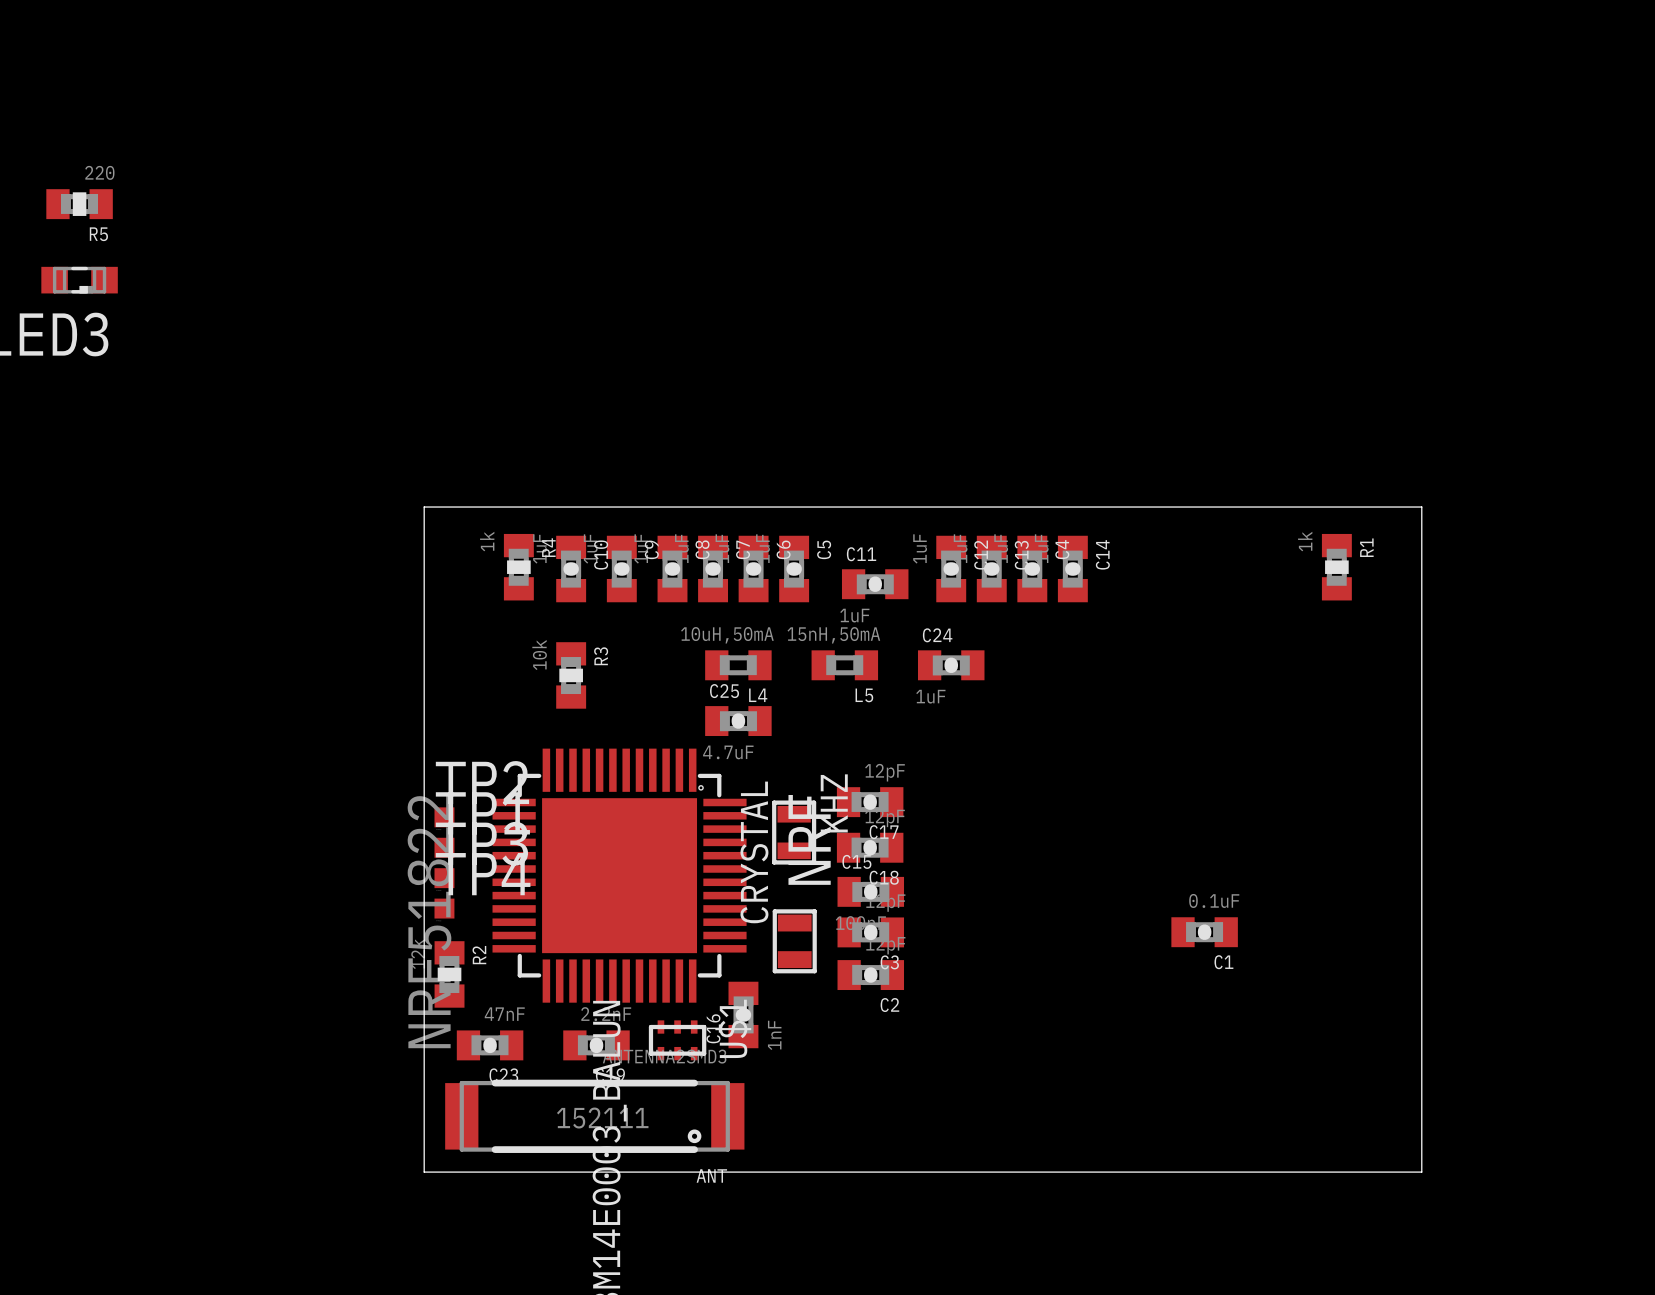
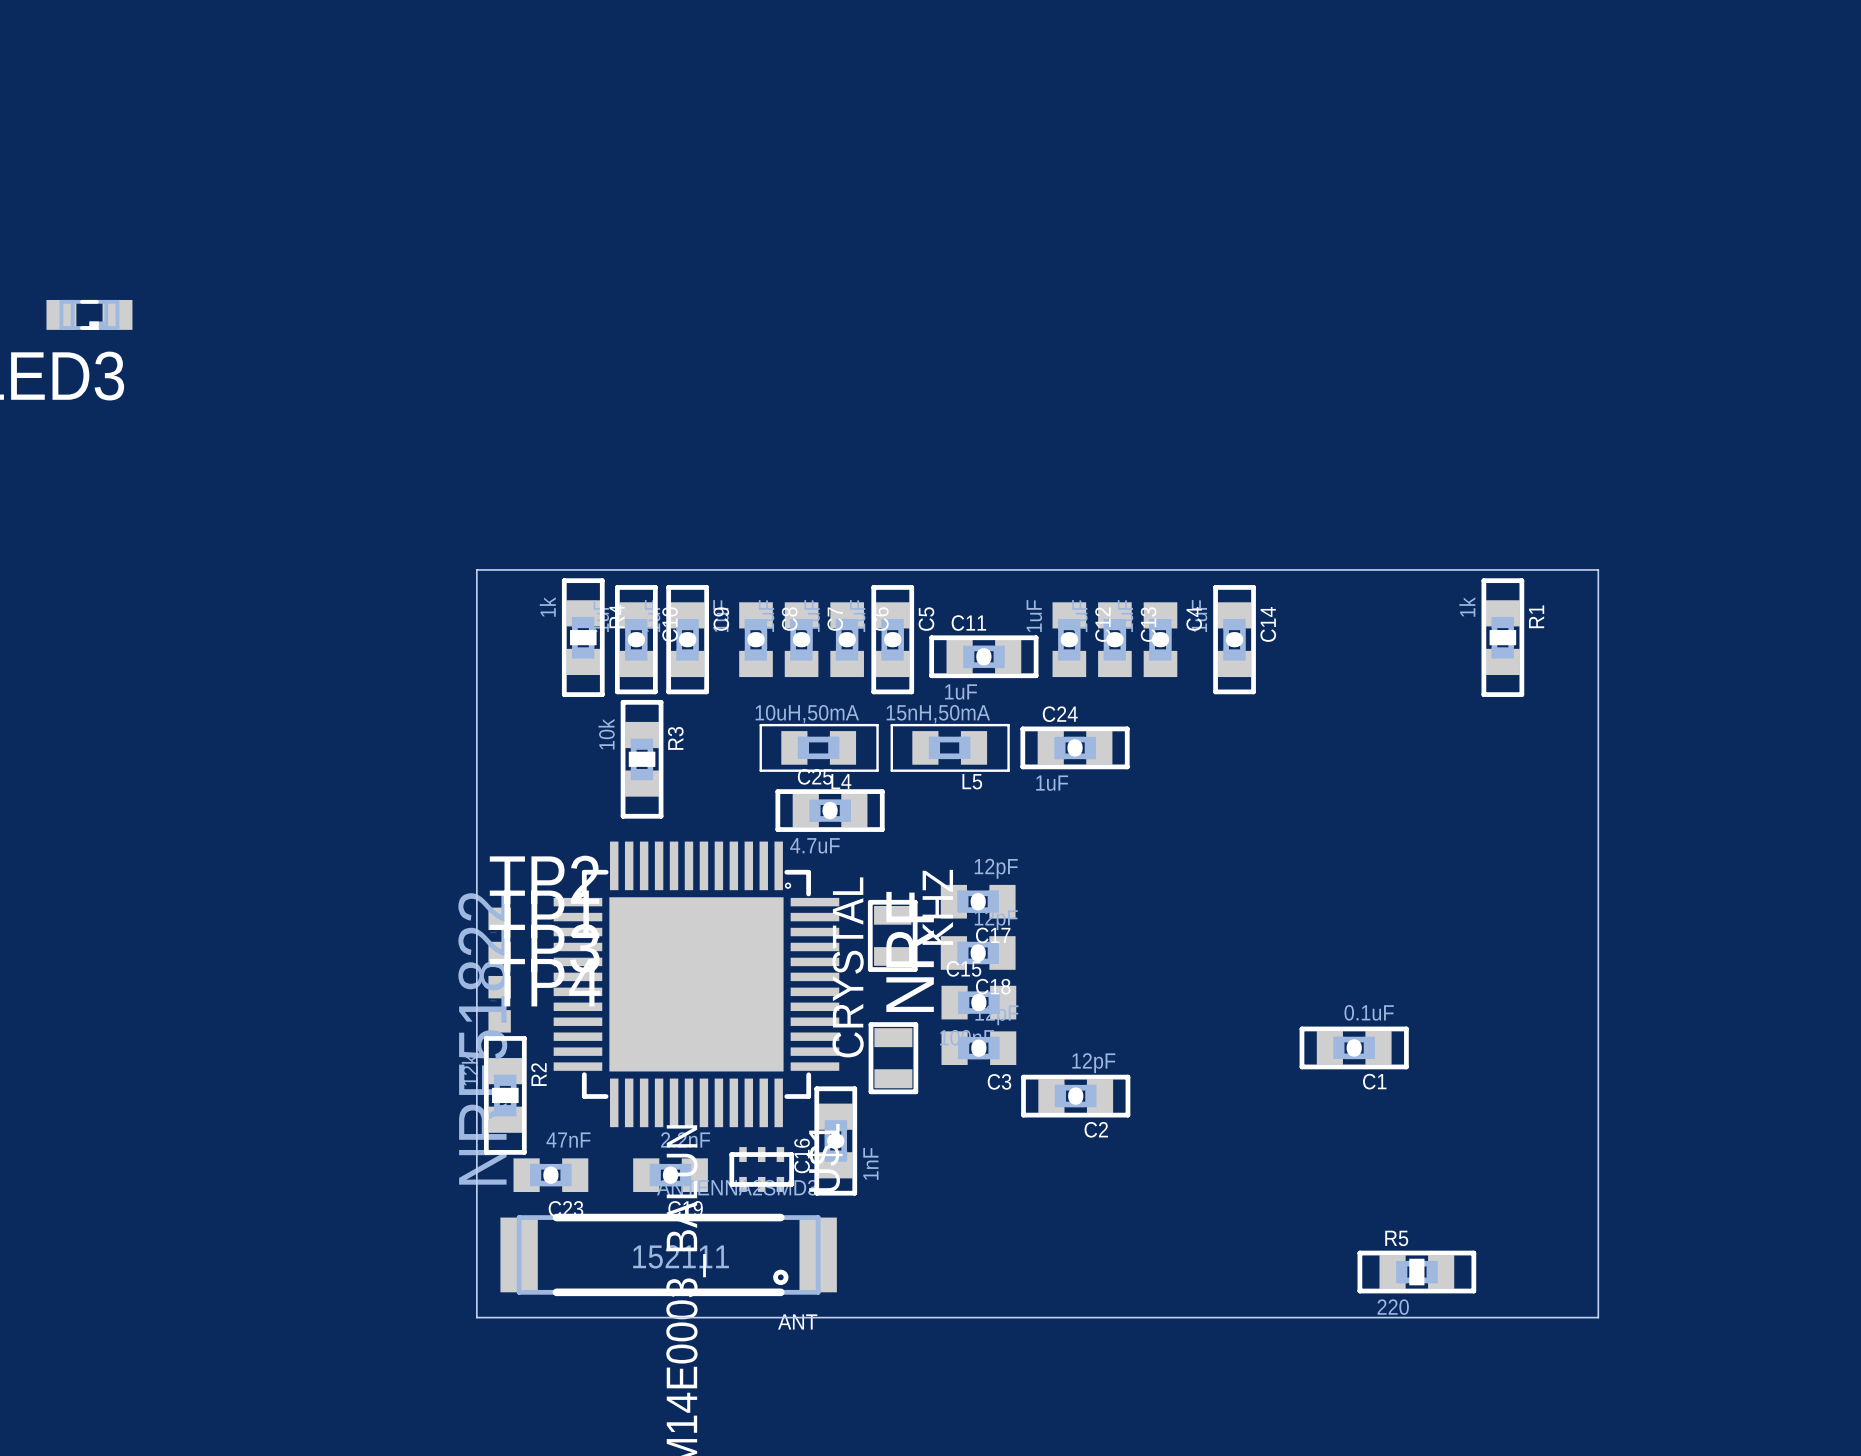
R5 value position: 220 (99, 172) -> 220 (1393, 1307)
R5 footprint: [46, 189, 113, 220] -> [1357, 1250, 1477, 1294]
R4 footprint: [503, 533, 534, 601] -> [561, 578, 605, 697]
R1 footprint: [1321, 533, 1352, 601] -> [1481, 578, 1525, 697]
C10 footprint: [556, 535, 587, 603] -> [615, 585, 658, 695]
C9 footprint: [606, 535, 637, 603] -> [666, 585, 710, 695]
C5 footprint: [779, 535, 810, 603] -> [871, 585, 915, 695]
C14 footprint: [1057, 535, 1088, 603] -> [1213, 585, 1256, 695]
C11 footprint: [841, 569, 909, 600] -> [929, 635, 1039, 679]
R3 footprint: [556, 642, 587, 709] -> [620, 699, 664, 819]
L4 footprint: [705, 650, 772, 681] -> [759, 723, 879, 772]
L5 footprint: [811, 650, 879, 681] -> [890, 723, 1010, 772]
C24 footprint: [917, 650, 985, 681] -> [1020, 726, 1130, 770]
C25 footprint: [705, 706, 772, 737] -> [775, 789, 885, 832]
C1 footprint: [1171, 917, 1238, 948] -> [1299, 1026, 1409, 1070]
R2 footprint: [434, 941, 465, 1008] -> [483, 1036, 527, 1155]
C2 footprint: [837, 960, 905, 991] -> [1021, 1074, 1131, 1118]
C16 footprint: [728, 981, 759, 1049] -> [814, 1086, 858, 1196]

